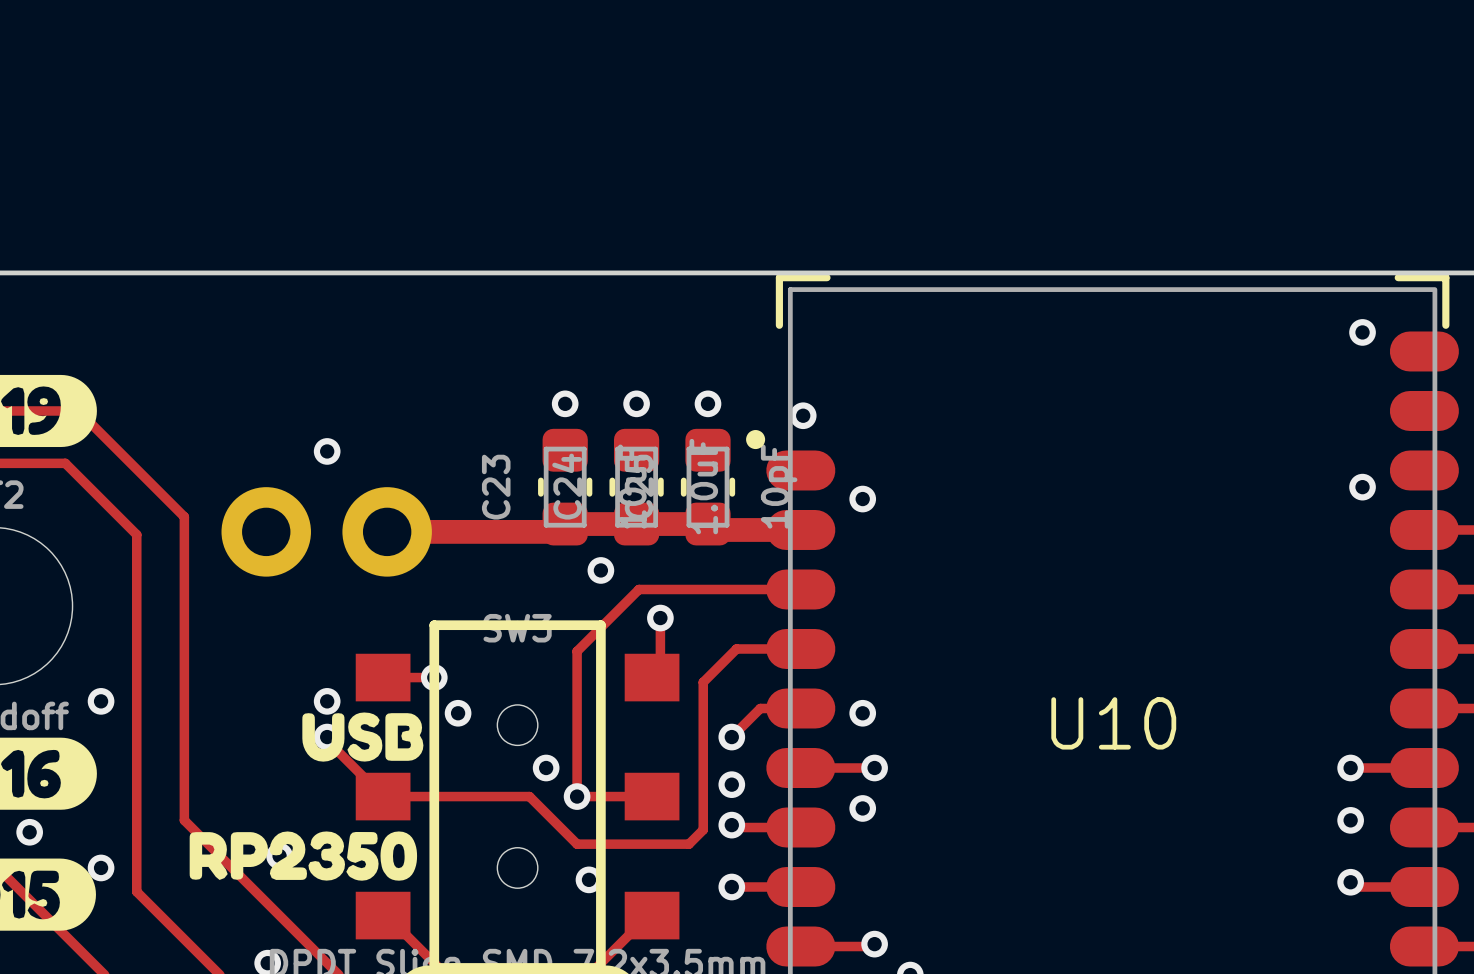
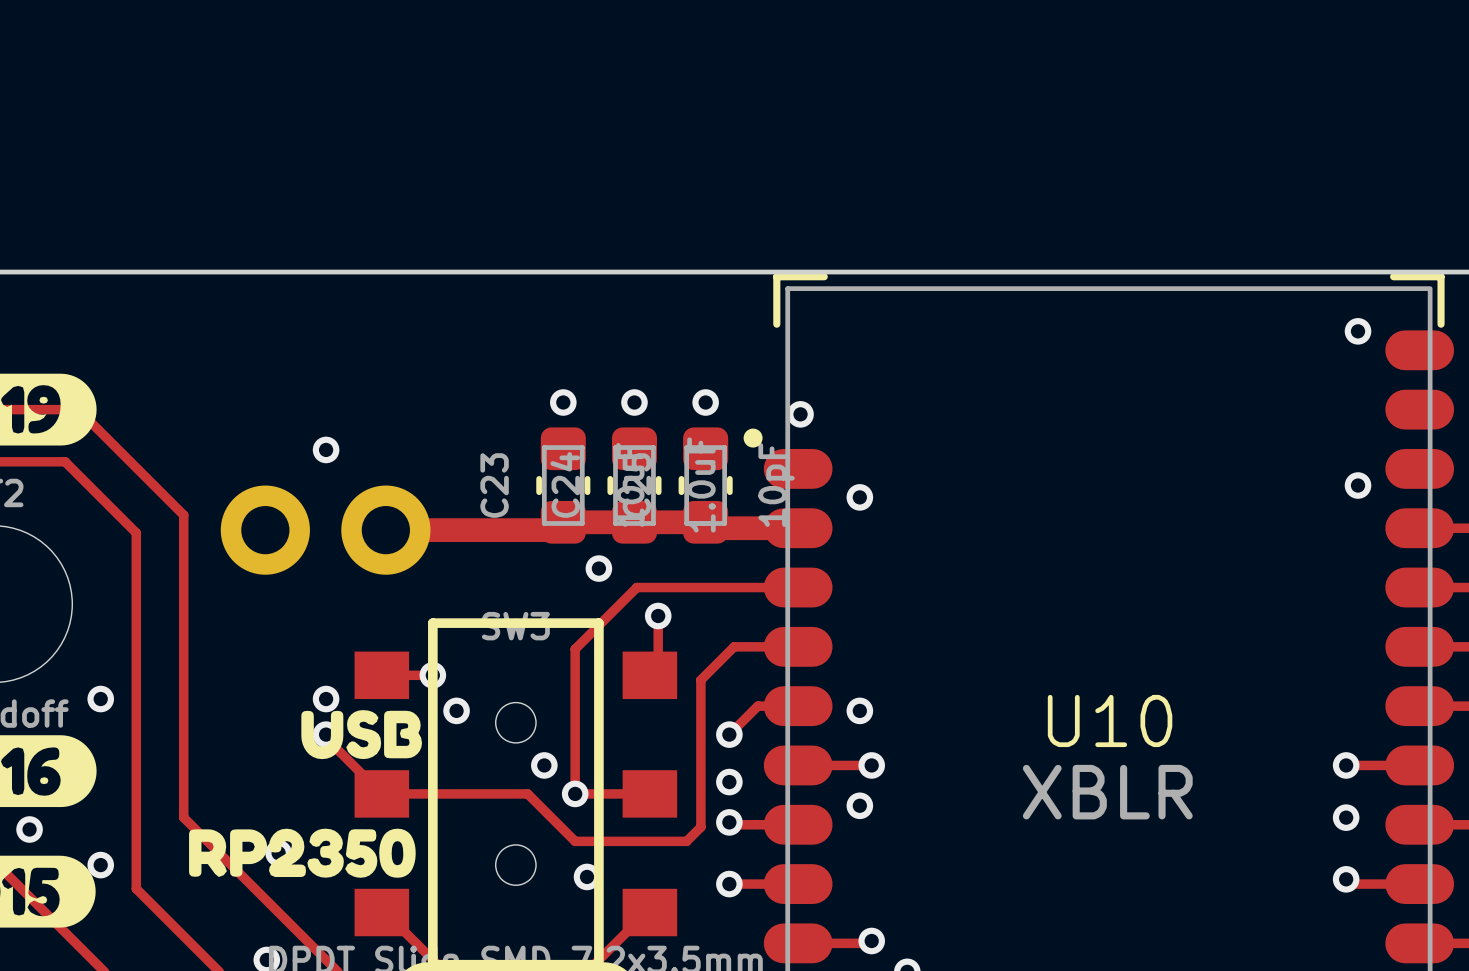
U10 value: none -> XBLR (1107, 792)

